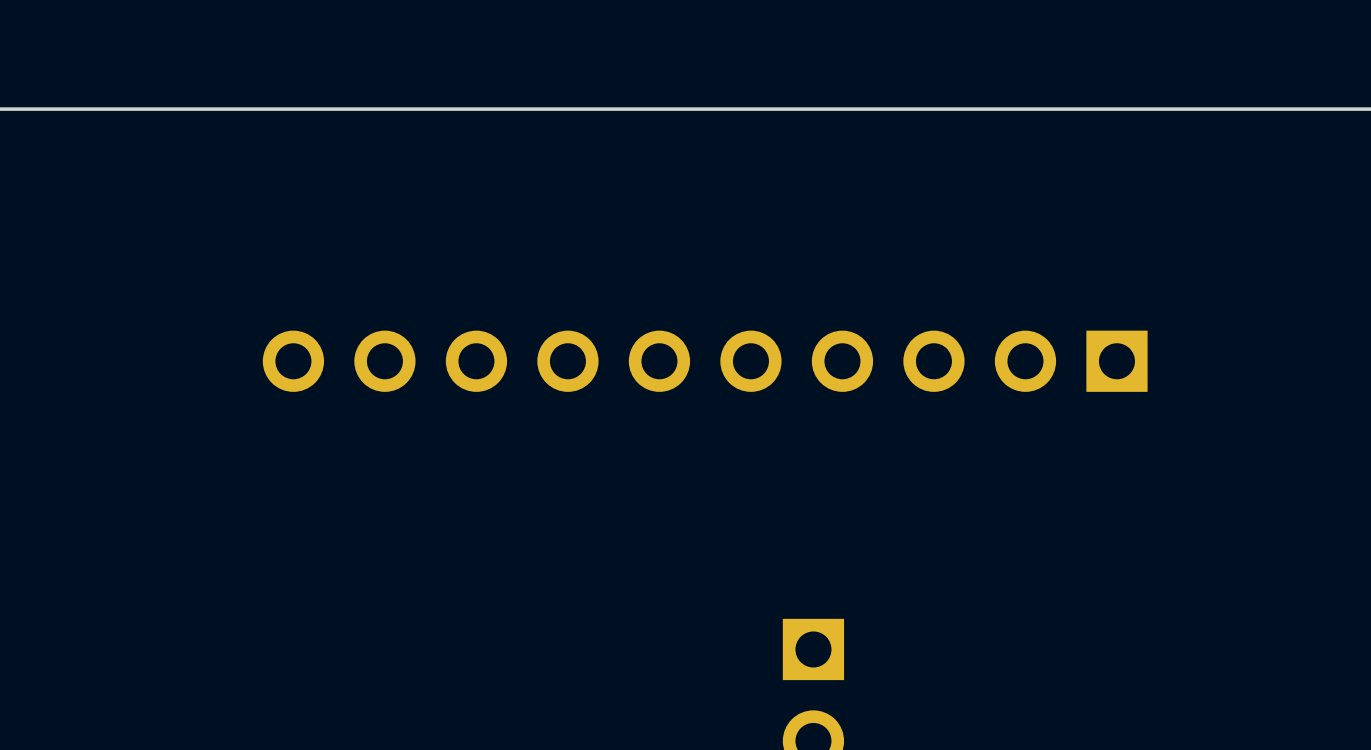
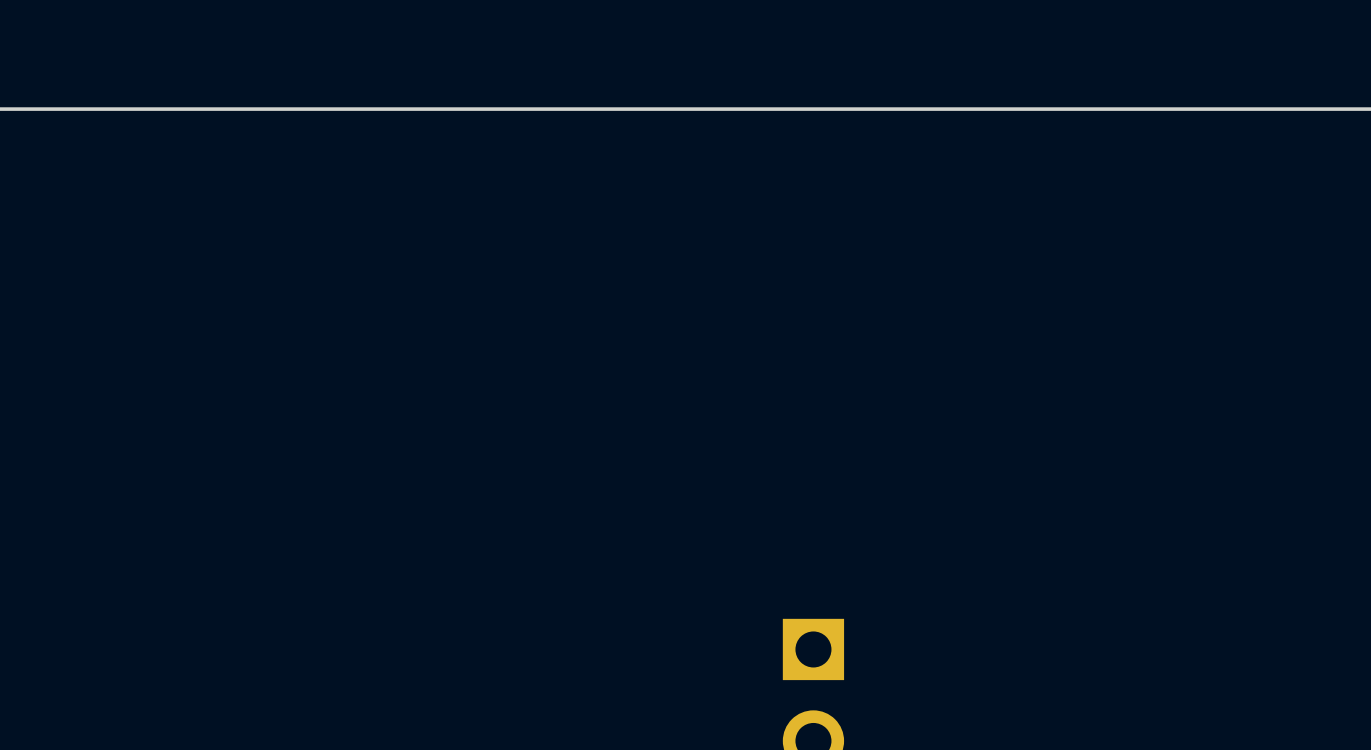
part: (705, 361) -> none

